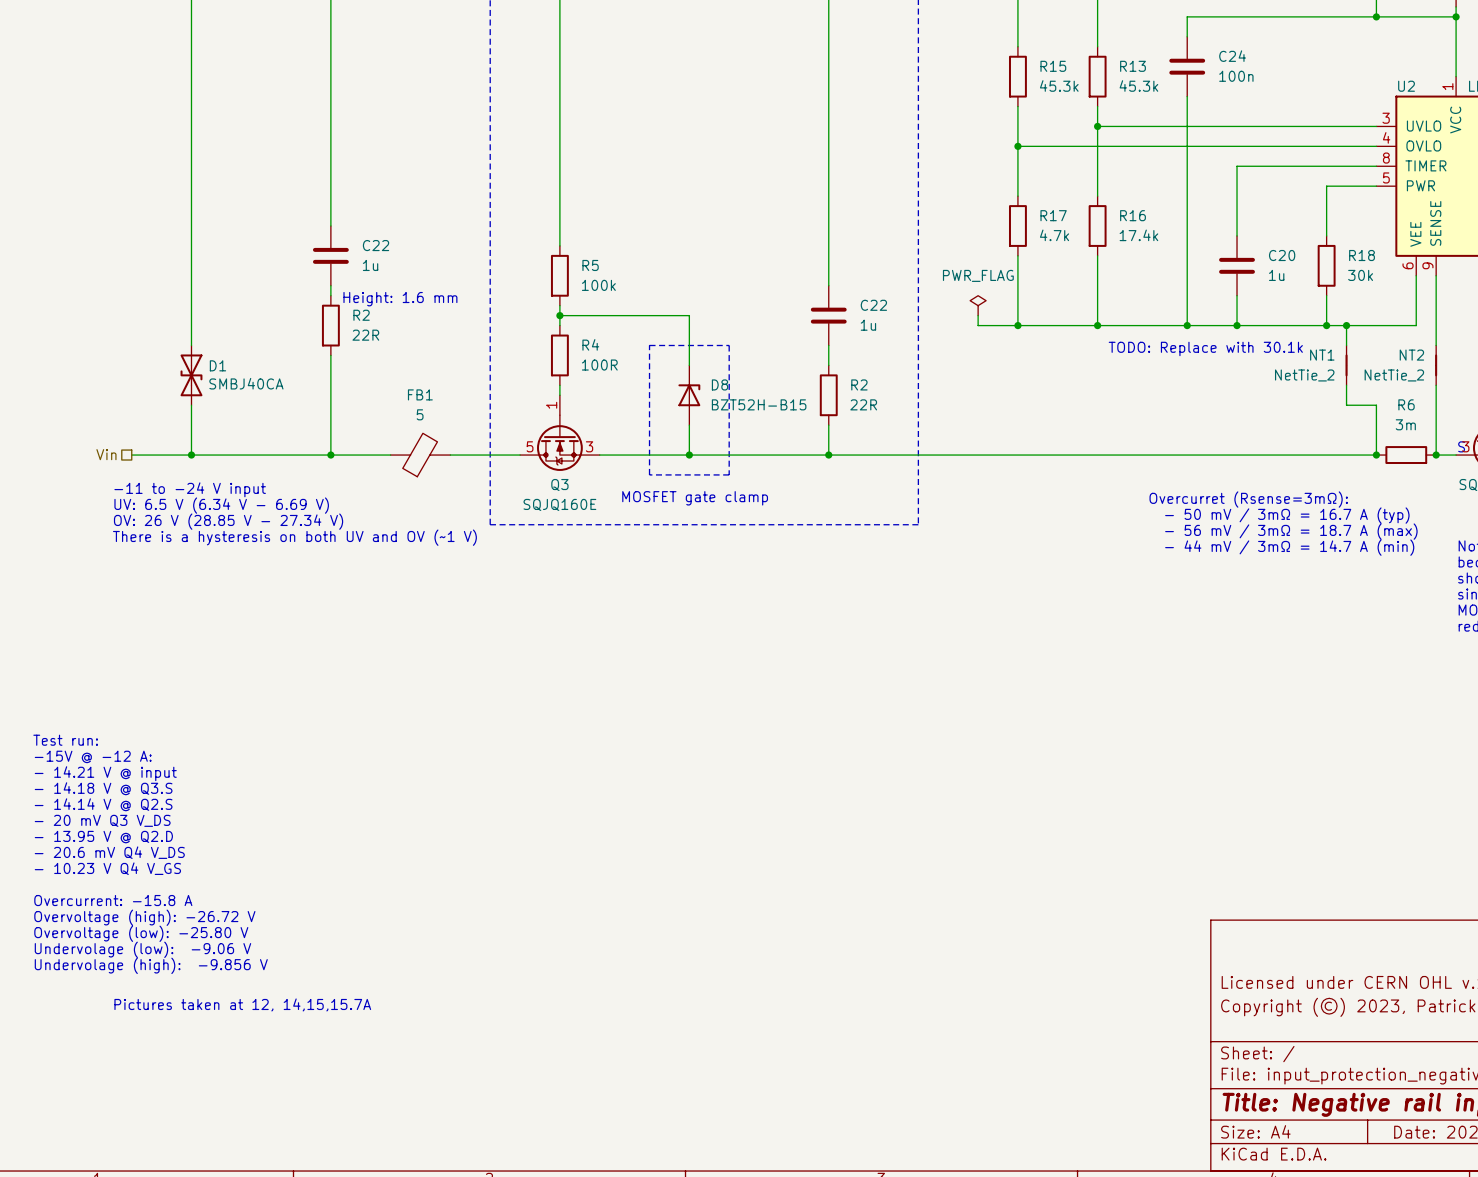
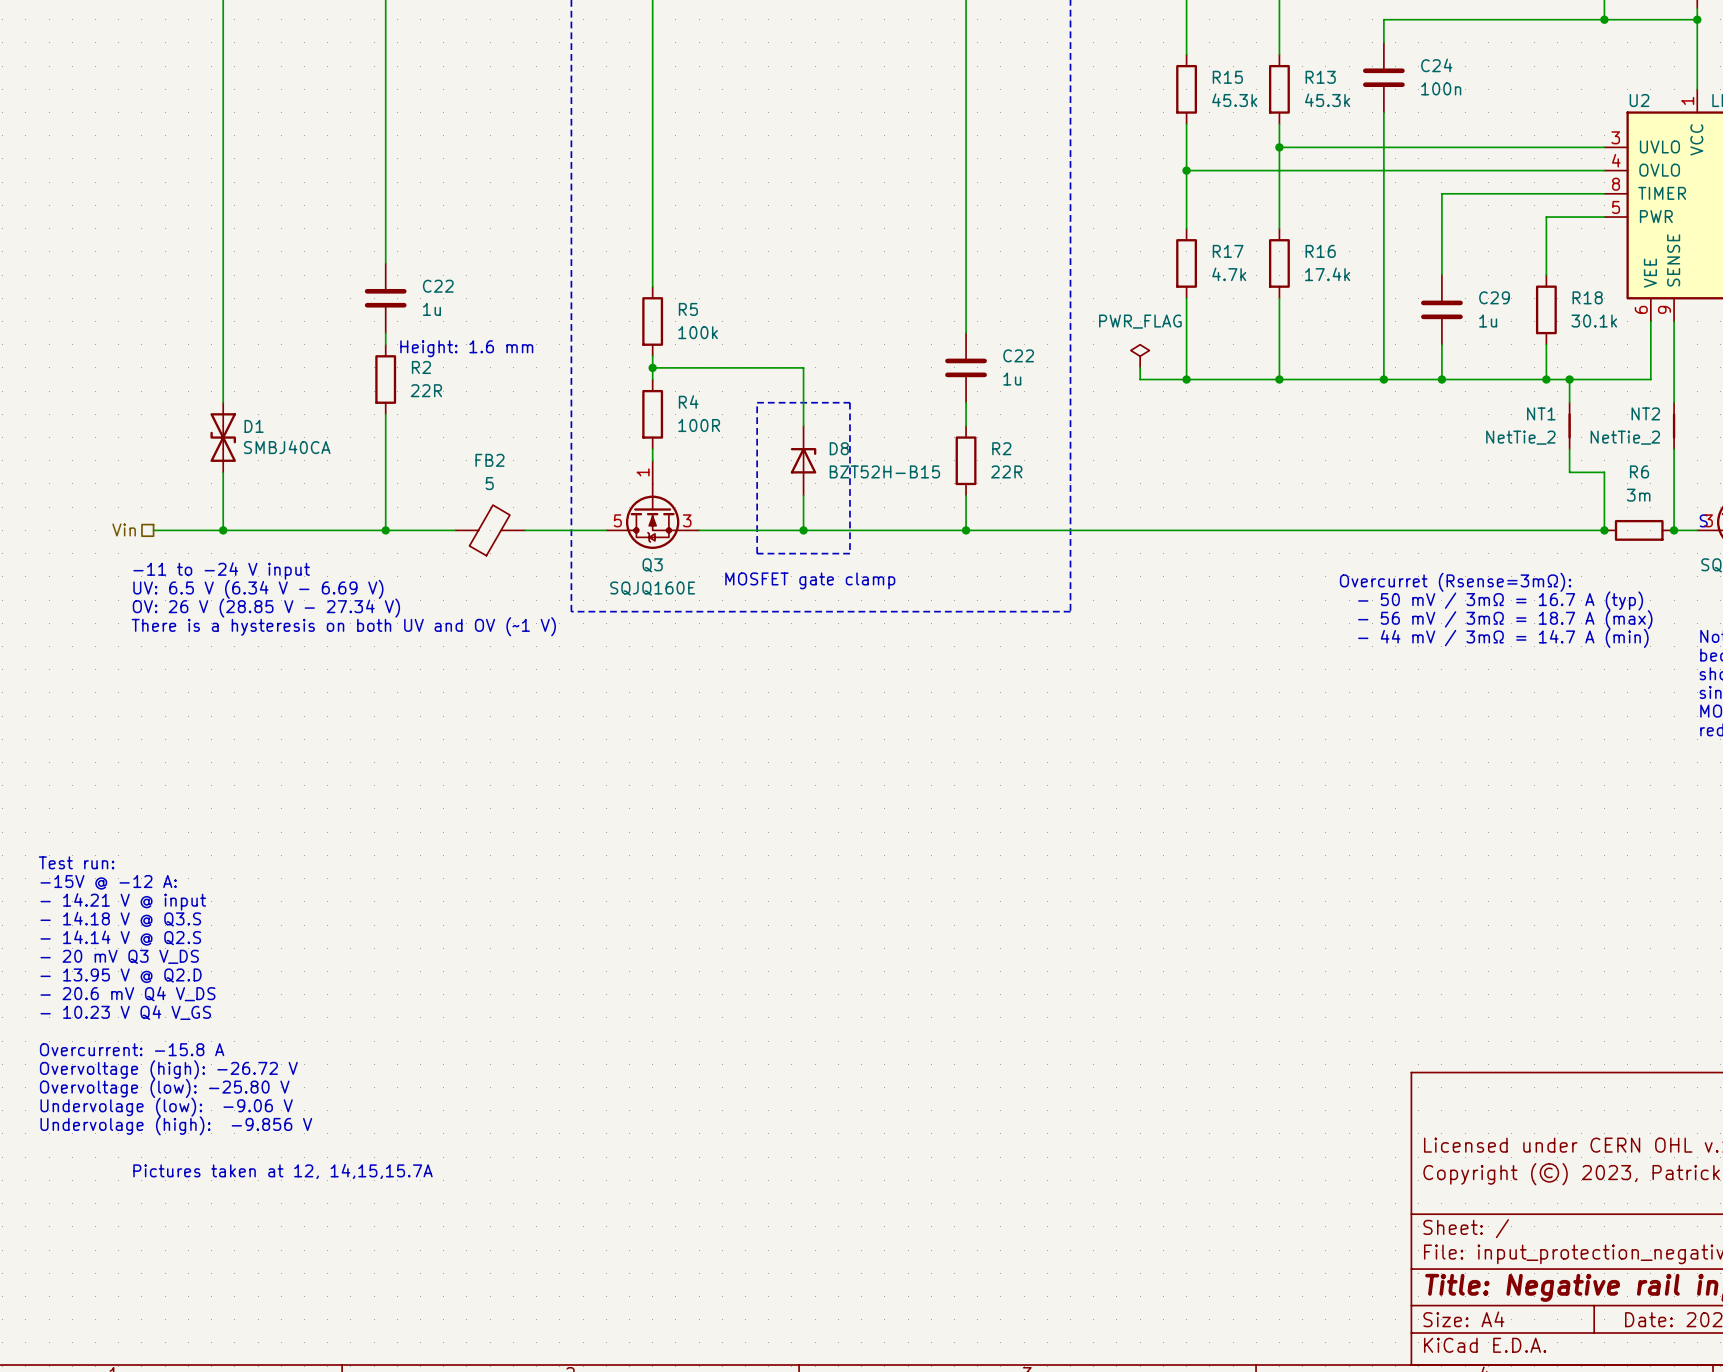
C20 name: C20 (1282, 255) -> C29 (1494, 297)
R18 value: 30k (1360, 275) -> 30.1k (1594, 321)
text: TODO: Replace with 30.1k (1205, 348) -> none
FB1 name: FB1 (420, 394) -> FB2 (489, 460)

